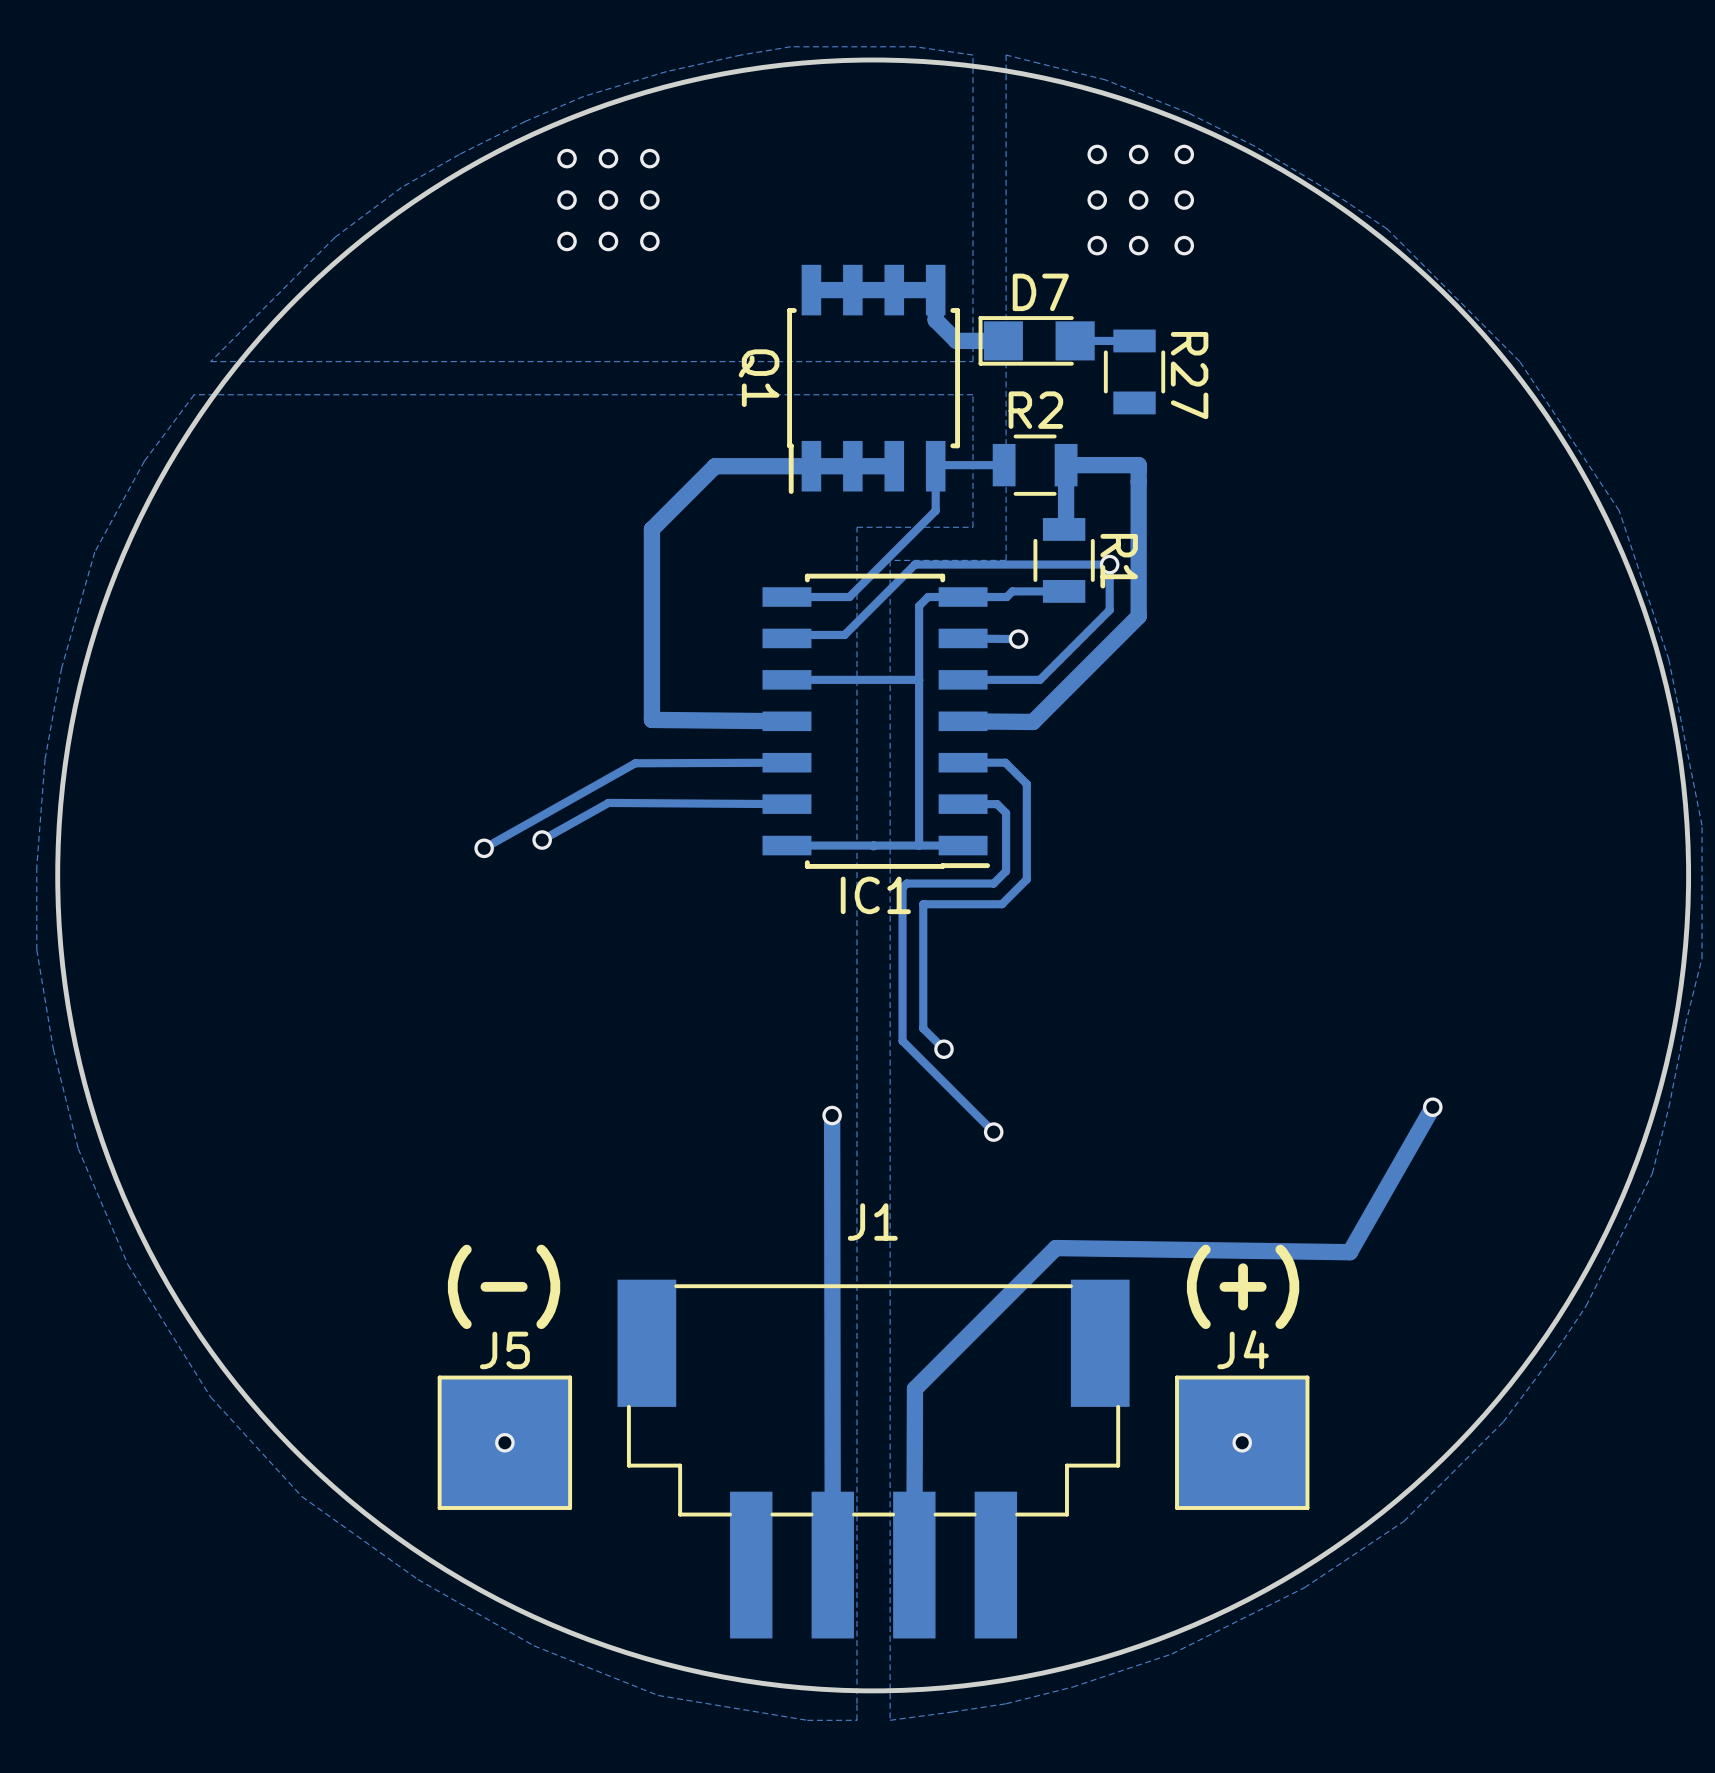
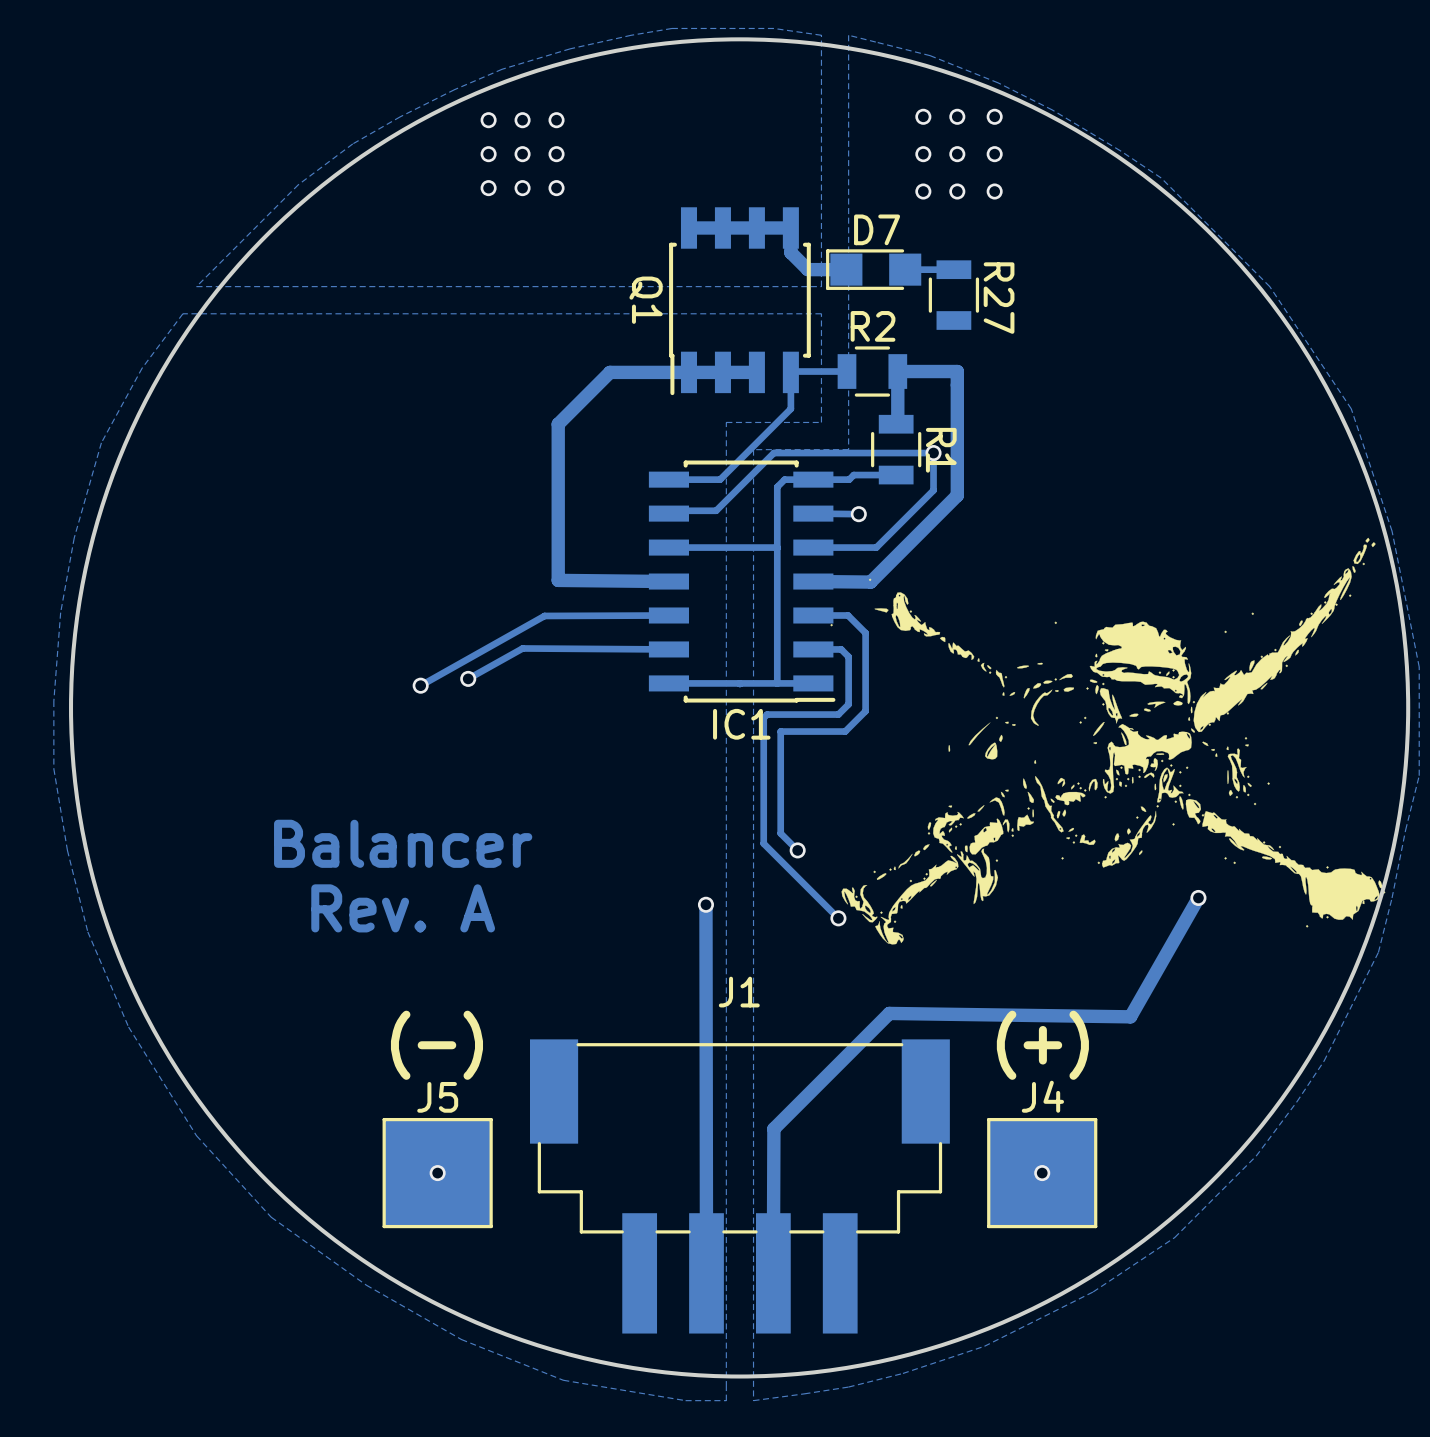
drawing: none -> [830, 537, 1386, 945]
text: none -> Balancer (403, 843)
text: none -> Rev. A (403, 908)

